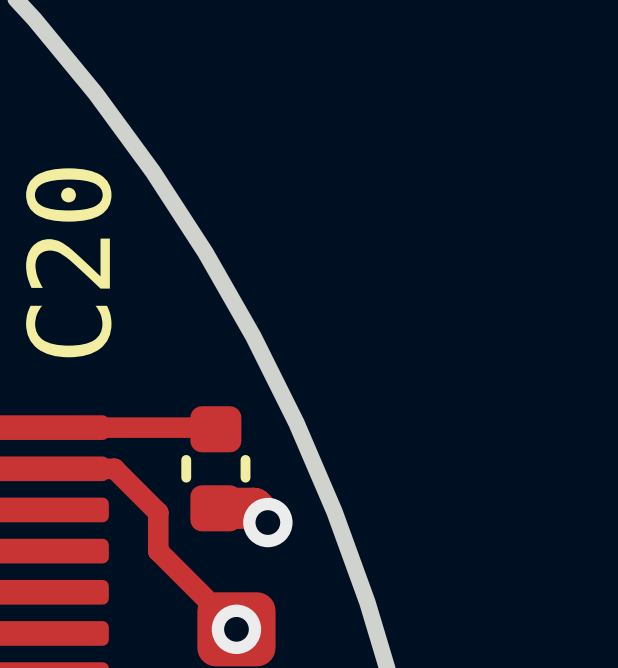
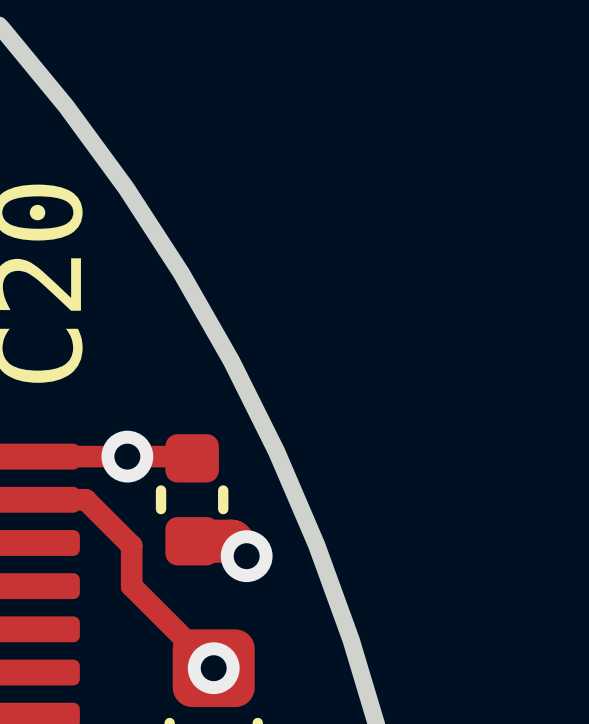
via: none -> (127, 456)

